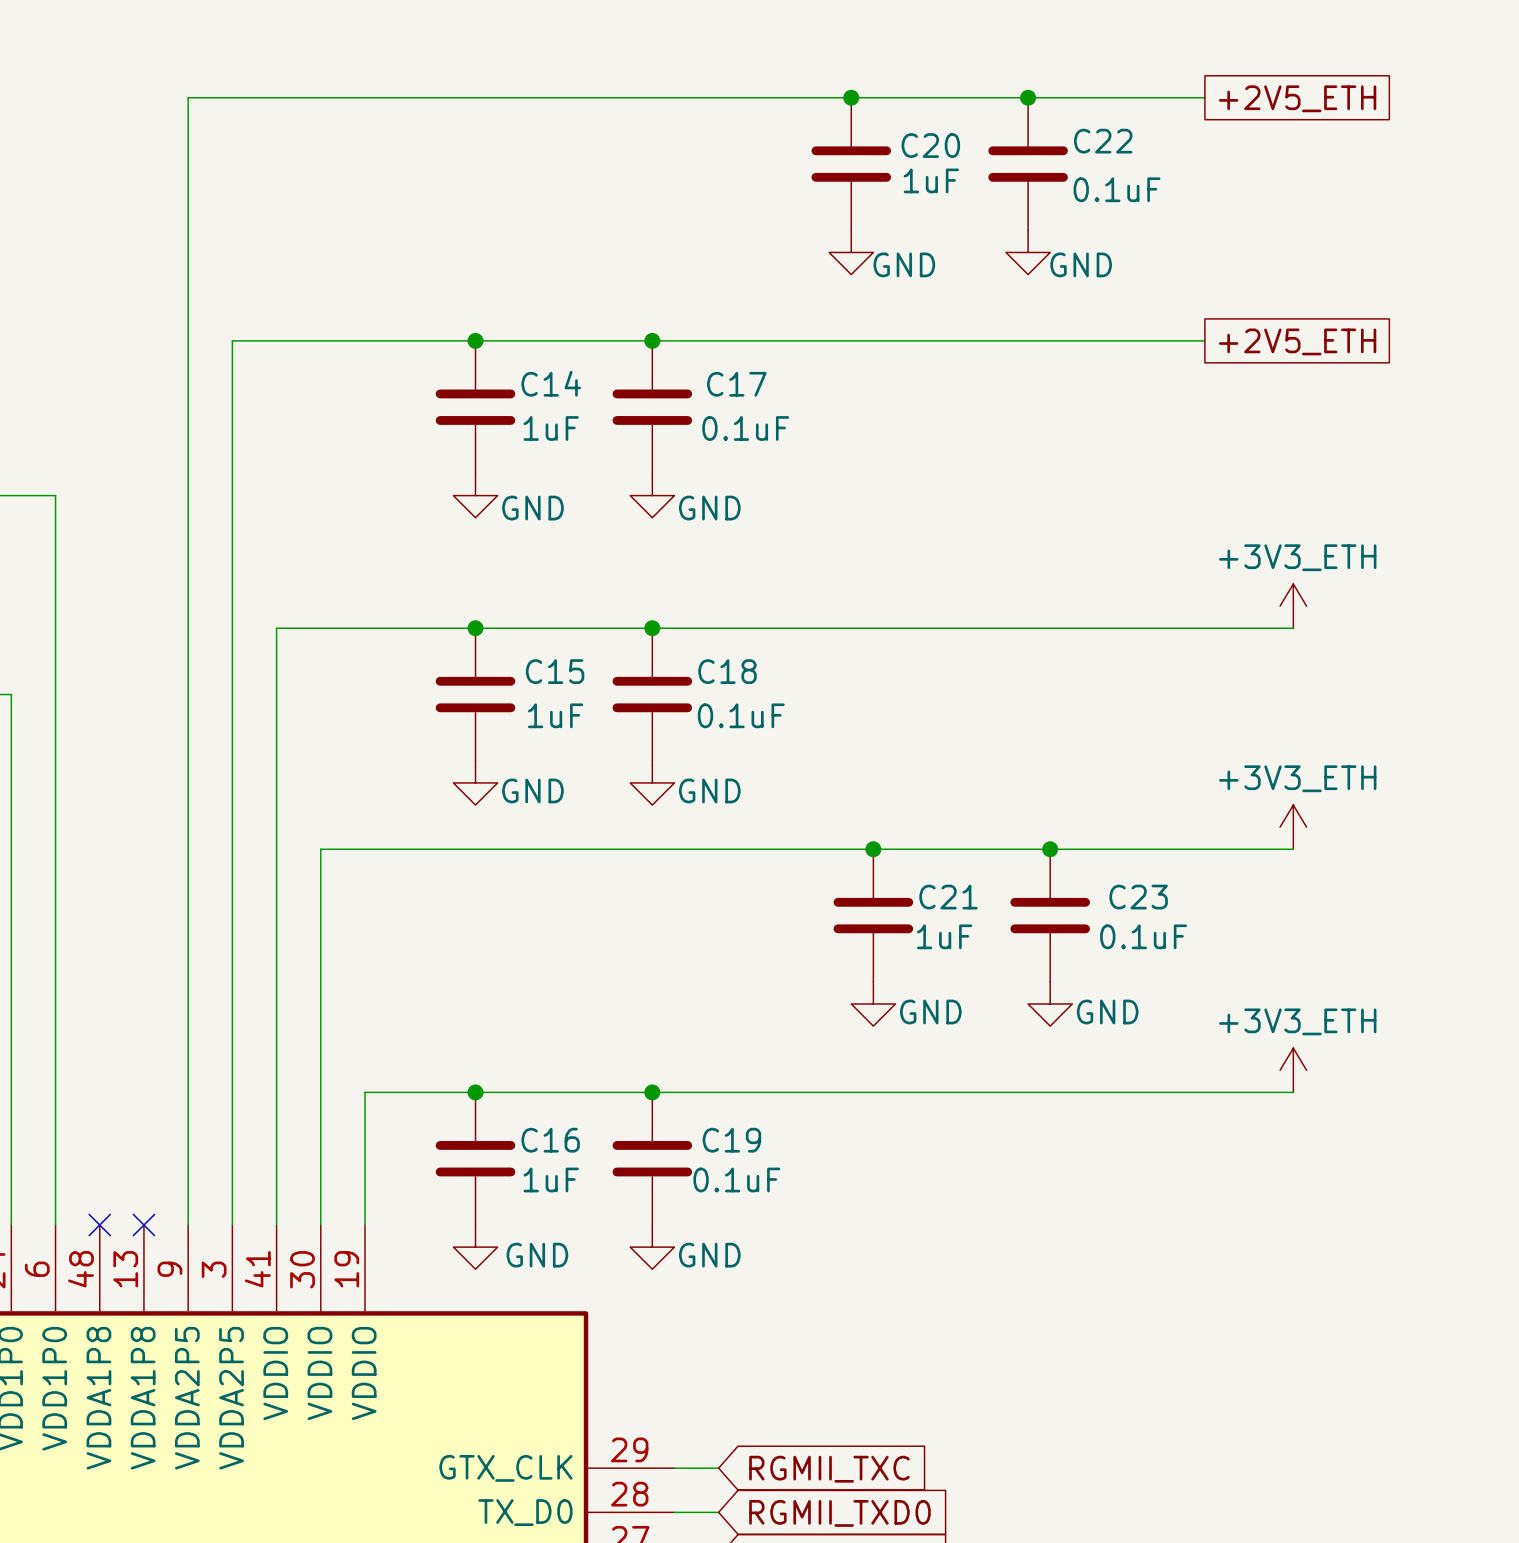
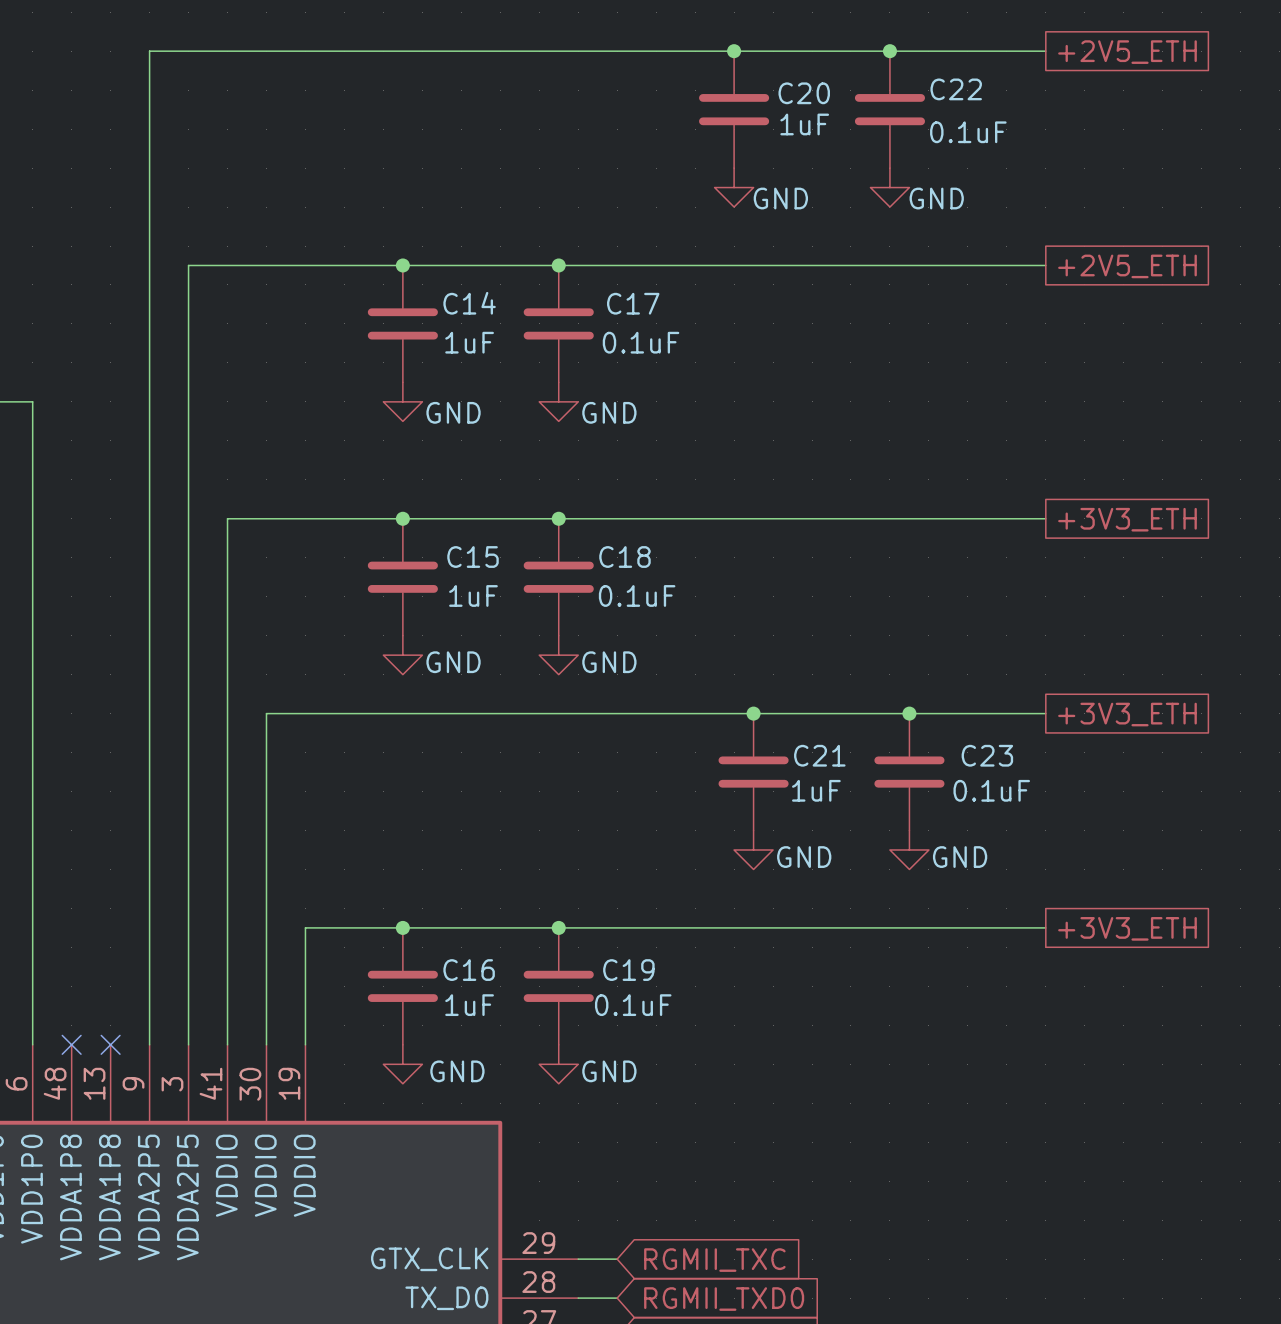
power symbol: +3V3_ETH (1293, 606) -> none
wire: (1204, 628) (1293, 628) -> none
global label: none -> +3V3_ETH (1127, 519)
power symbol: +3V3_ETH (1293, 827) -> none
wire: (1204, 849) (1293, 849) -> none
global label: none -> +3V3_ETH (1127, 714)
power symbol: +3V3_ETH (1293, 1070) -> none
wire: (1204, 1092) (1293, 1092) -> none
global label: none -> +3V3_ETH (1127, 928)

